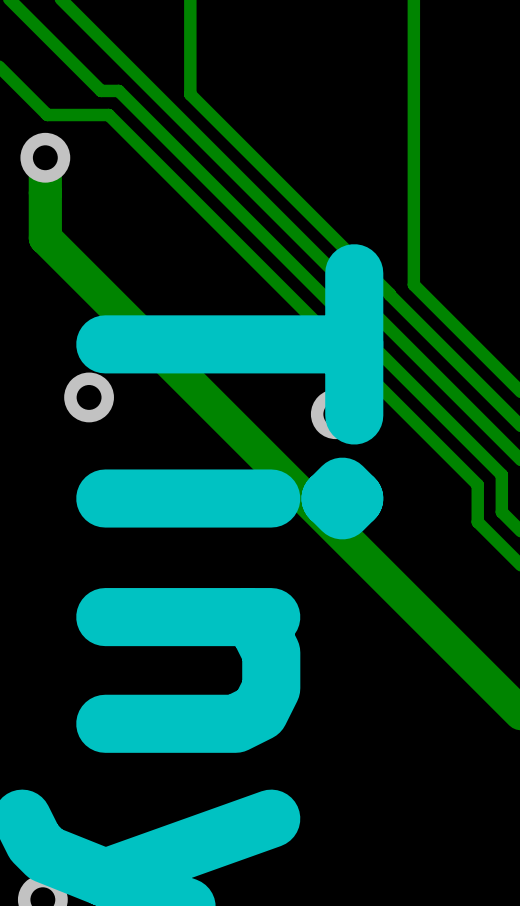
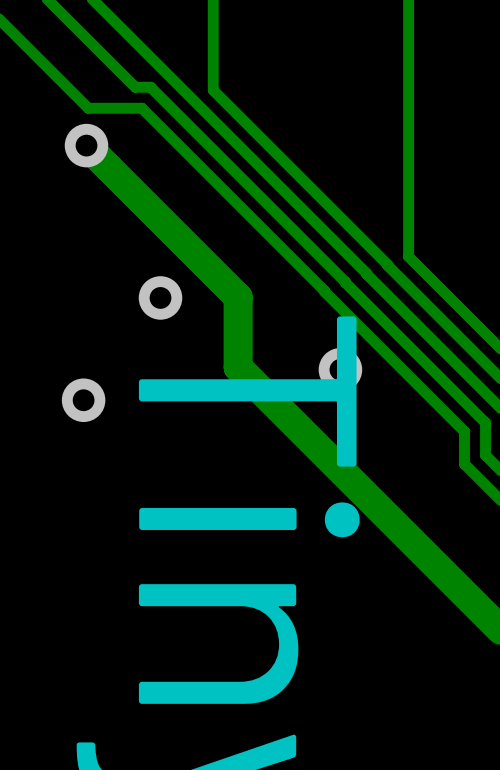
track: (45, 157) (45, 238) (218, 411) -> (86, 145) (238, 297) (238, 367)
via: none -> (160, 297)
via: (89, 397) -> none
via: none -> (83, 400)

